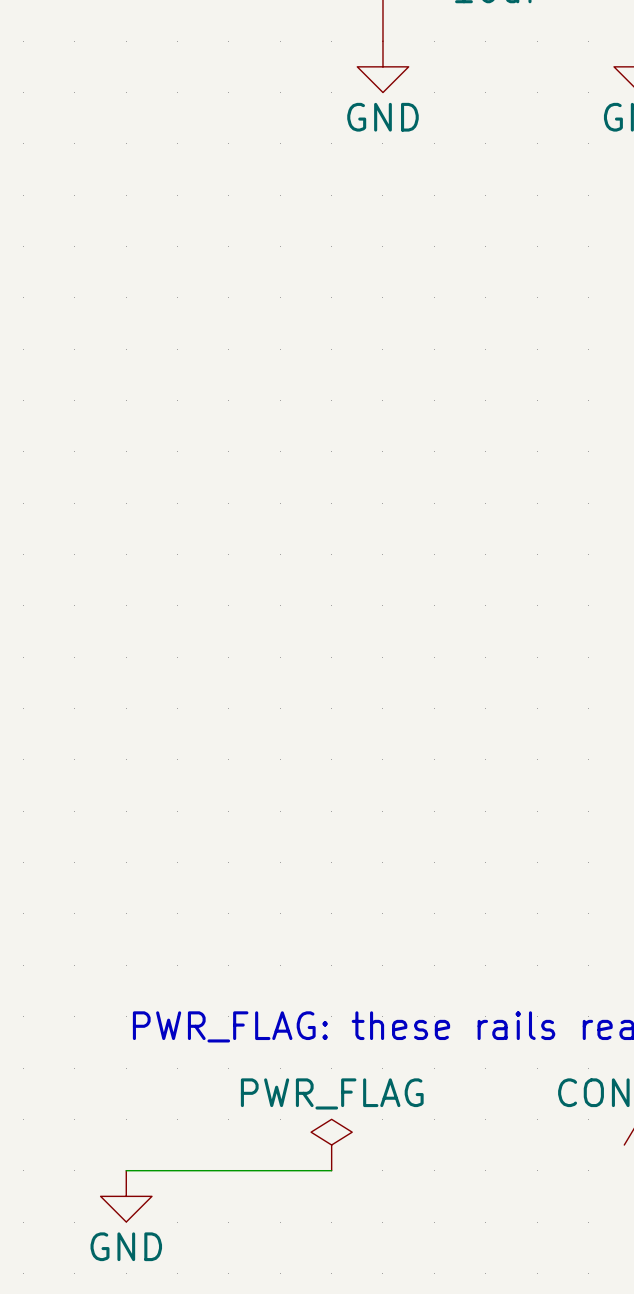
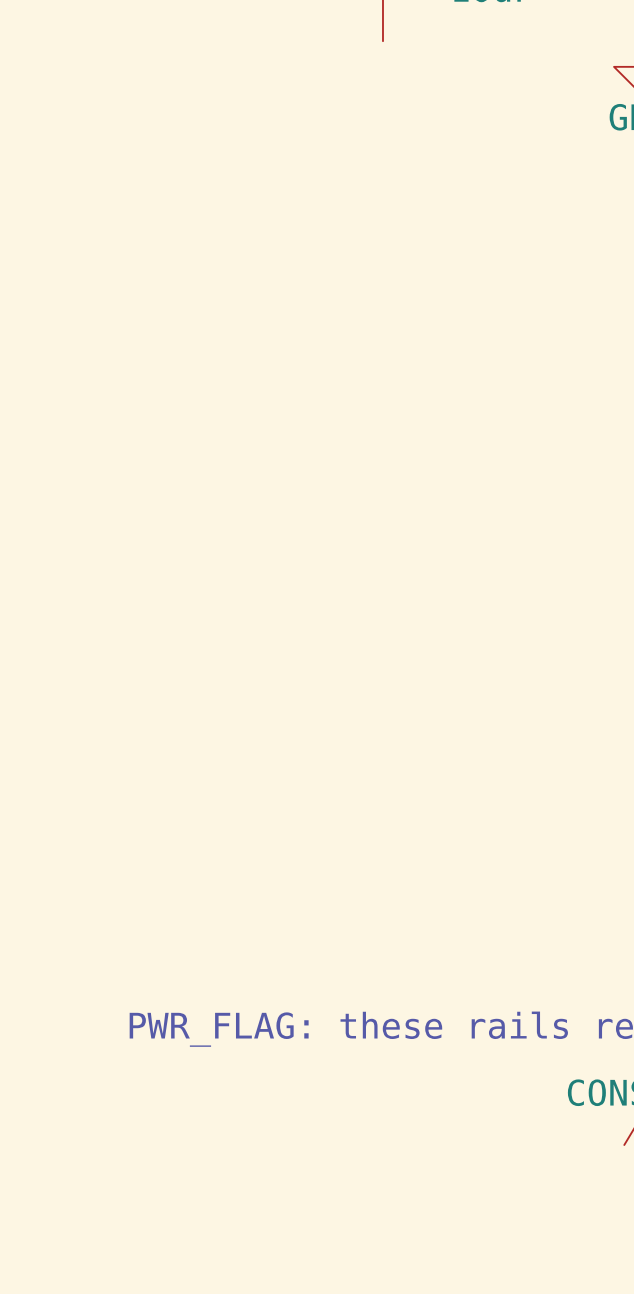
power symbol: GND (382, 66) -> none
power symbol: PWR_FLAG (331, 1145) -> none
wire: (126, 1170) (331, 1170) -> none
power symbol: GND (126, 1196) -> none

